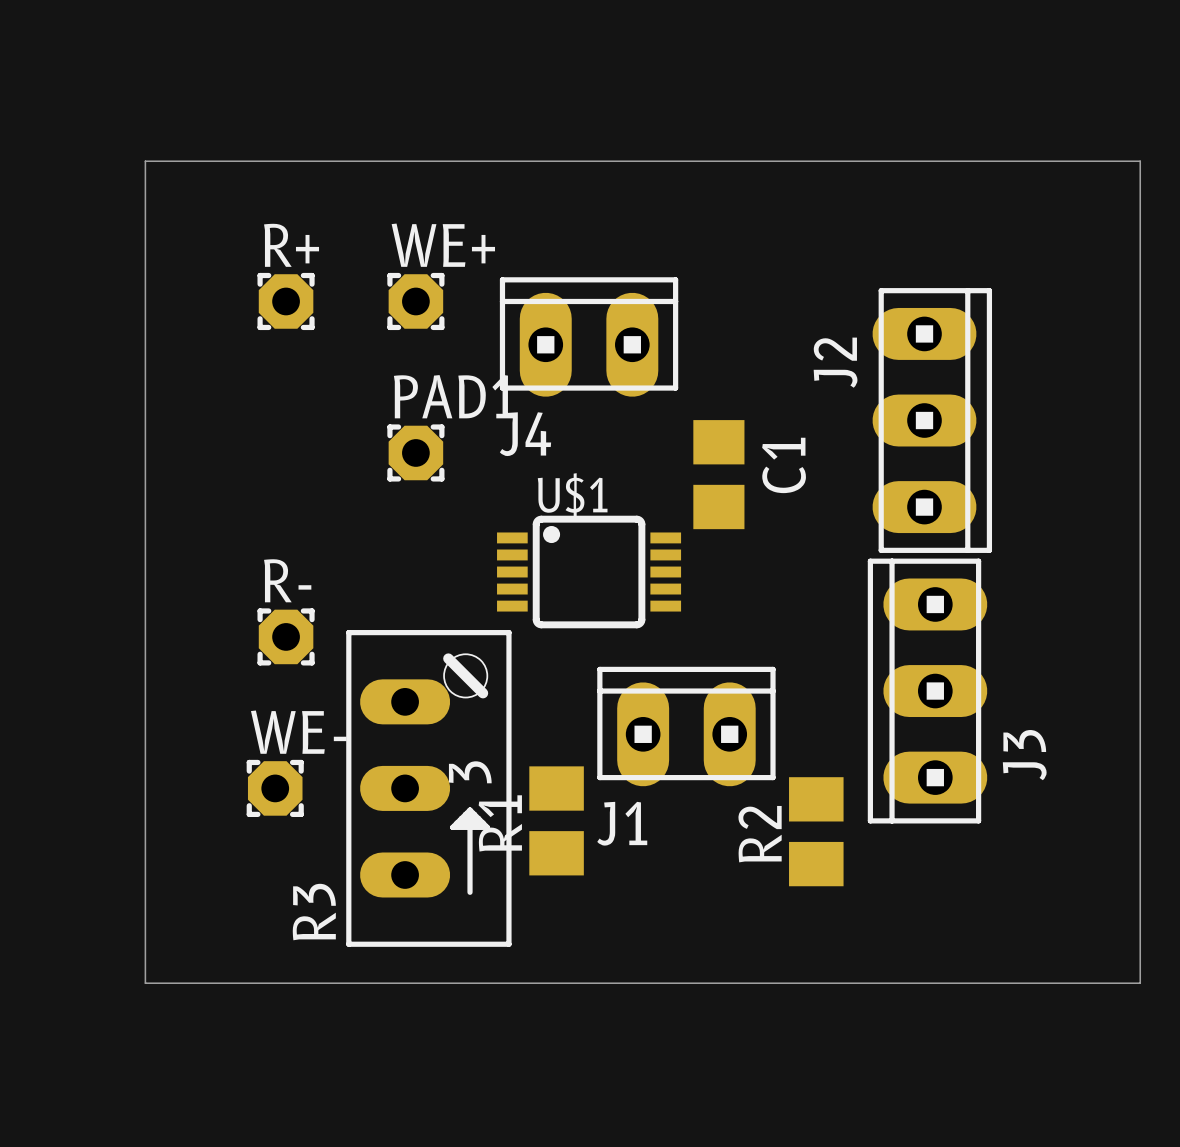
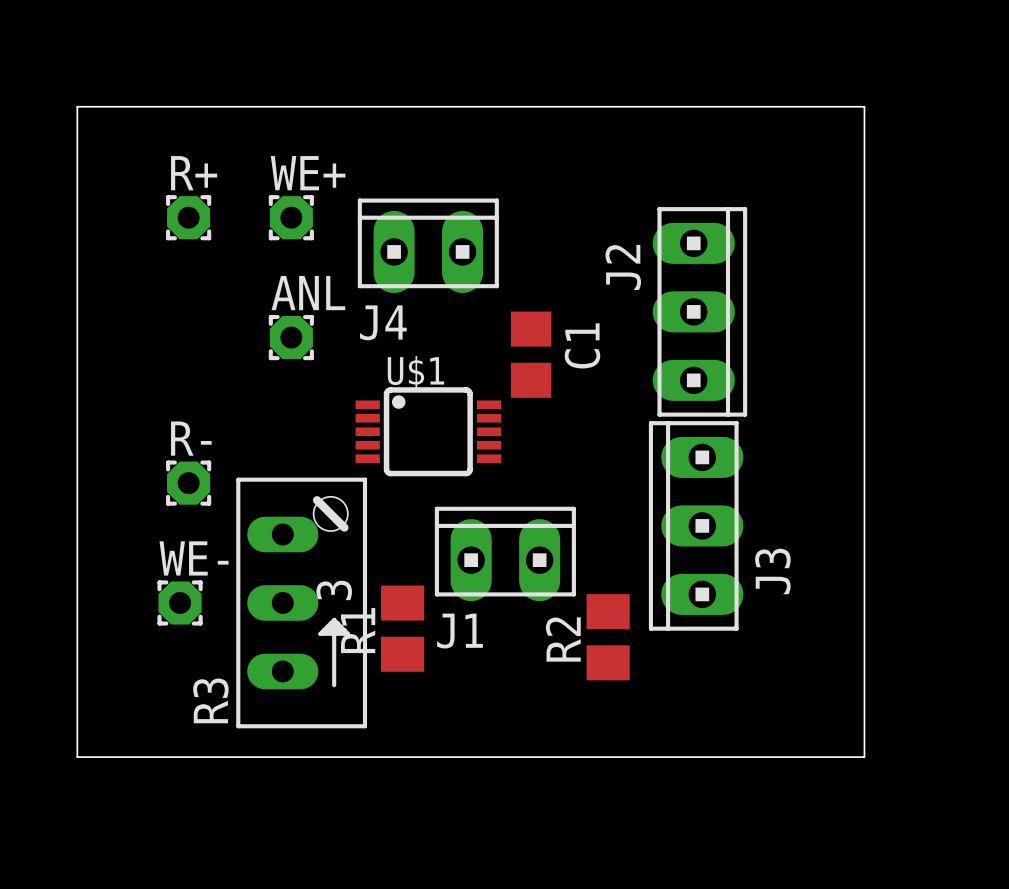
PAD1 name: PAD1 (454, 396) -> ANL (308, 293)

